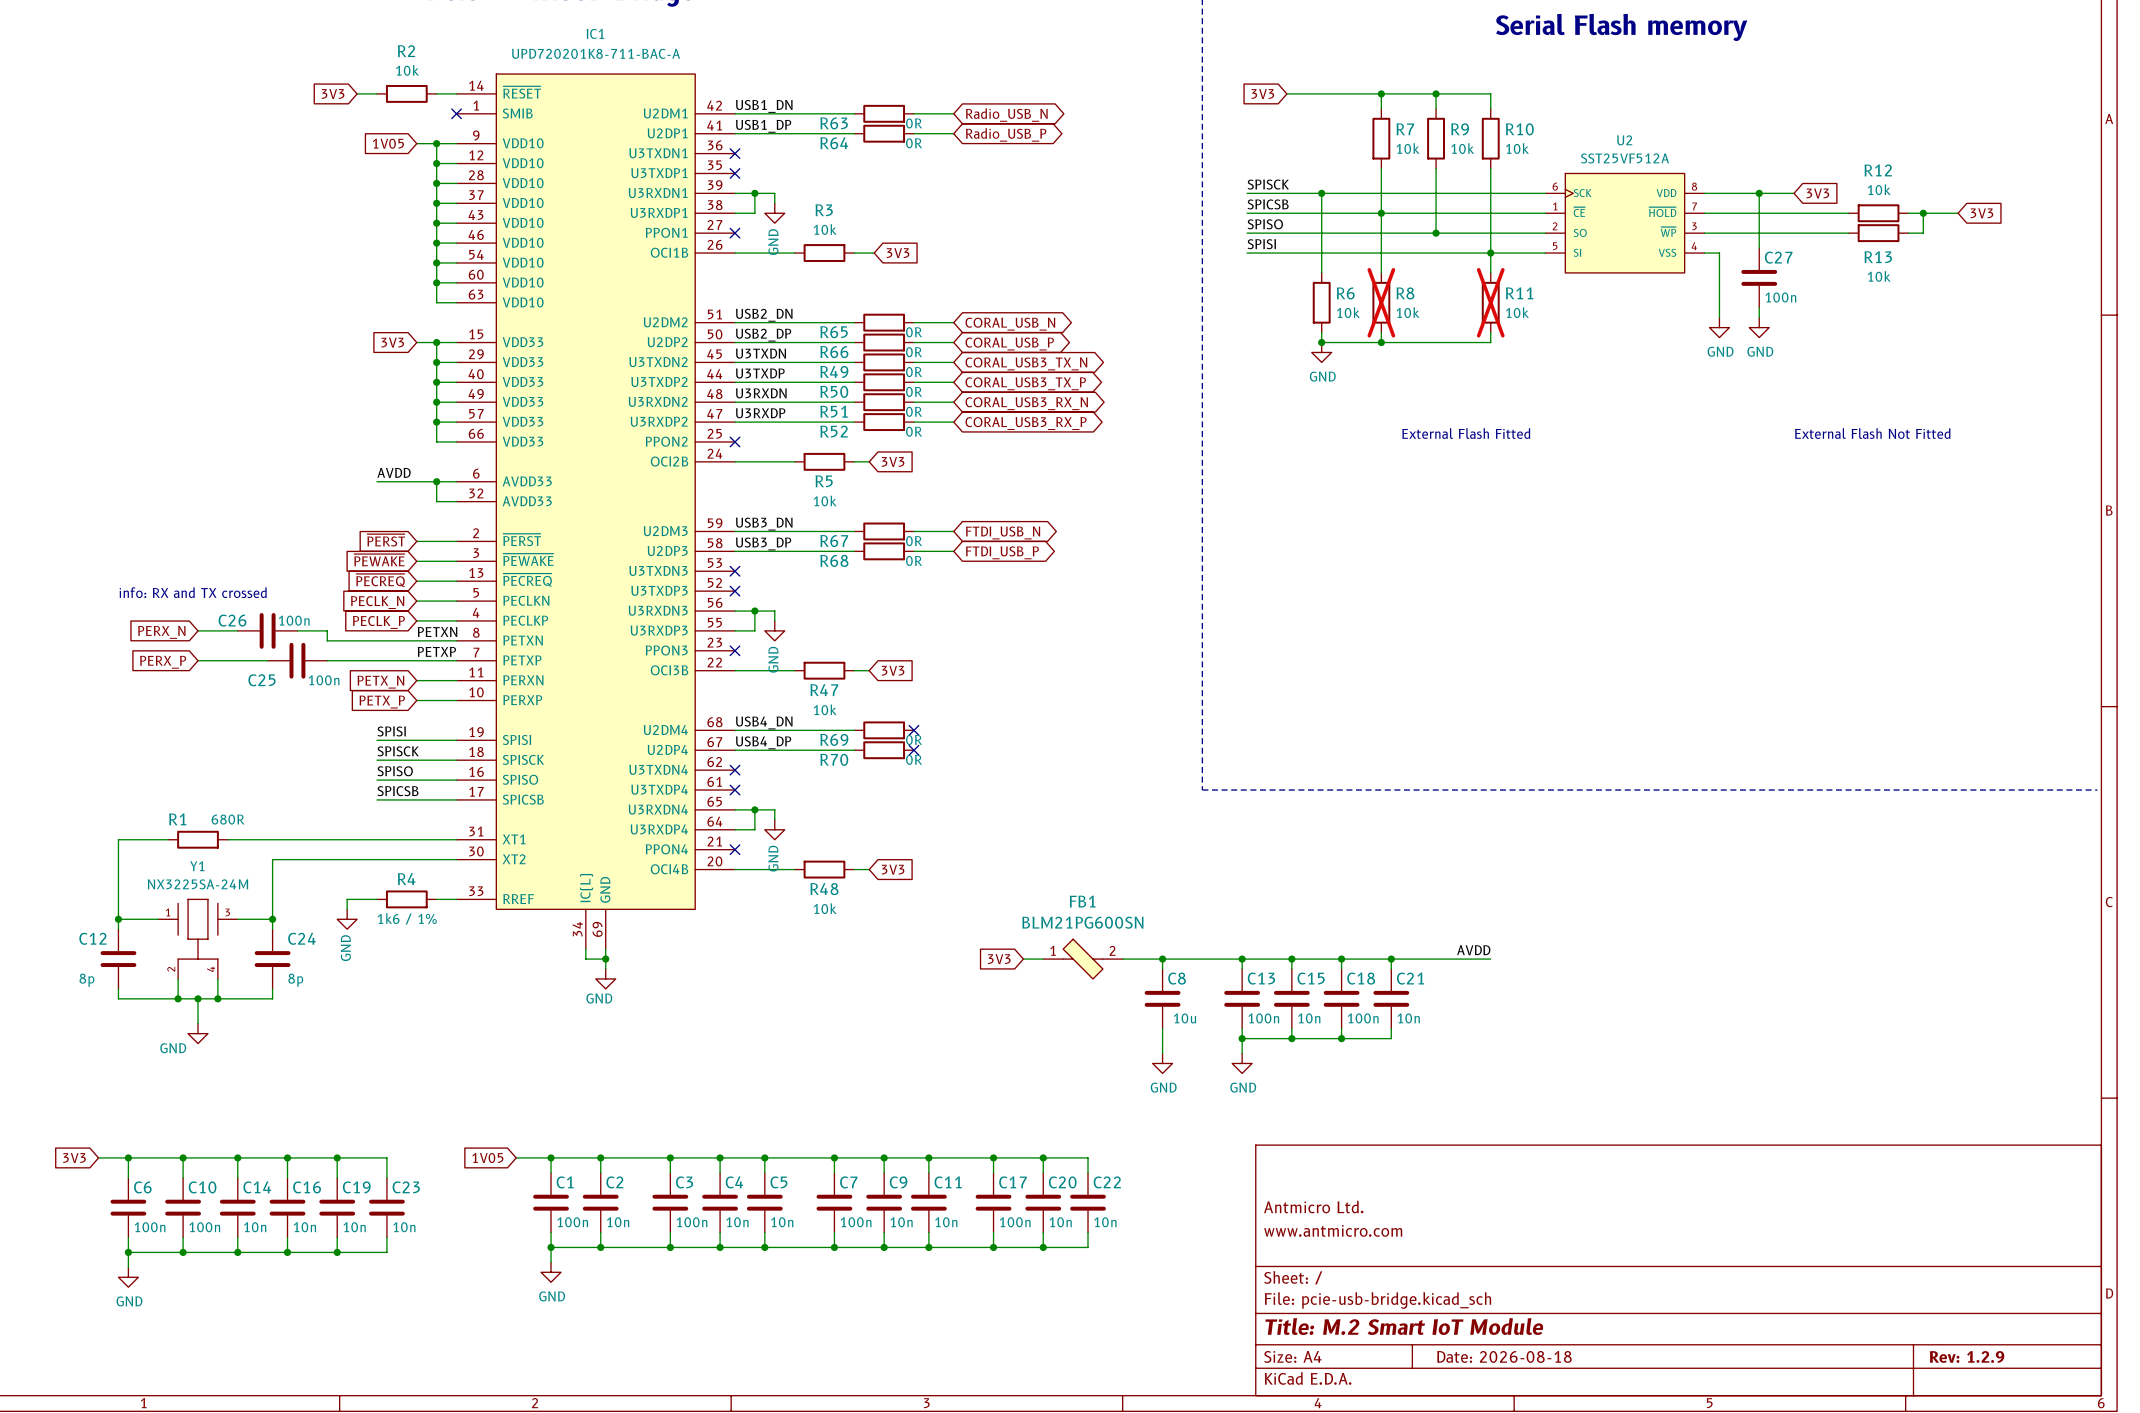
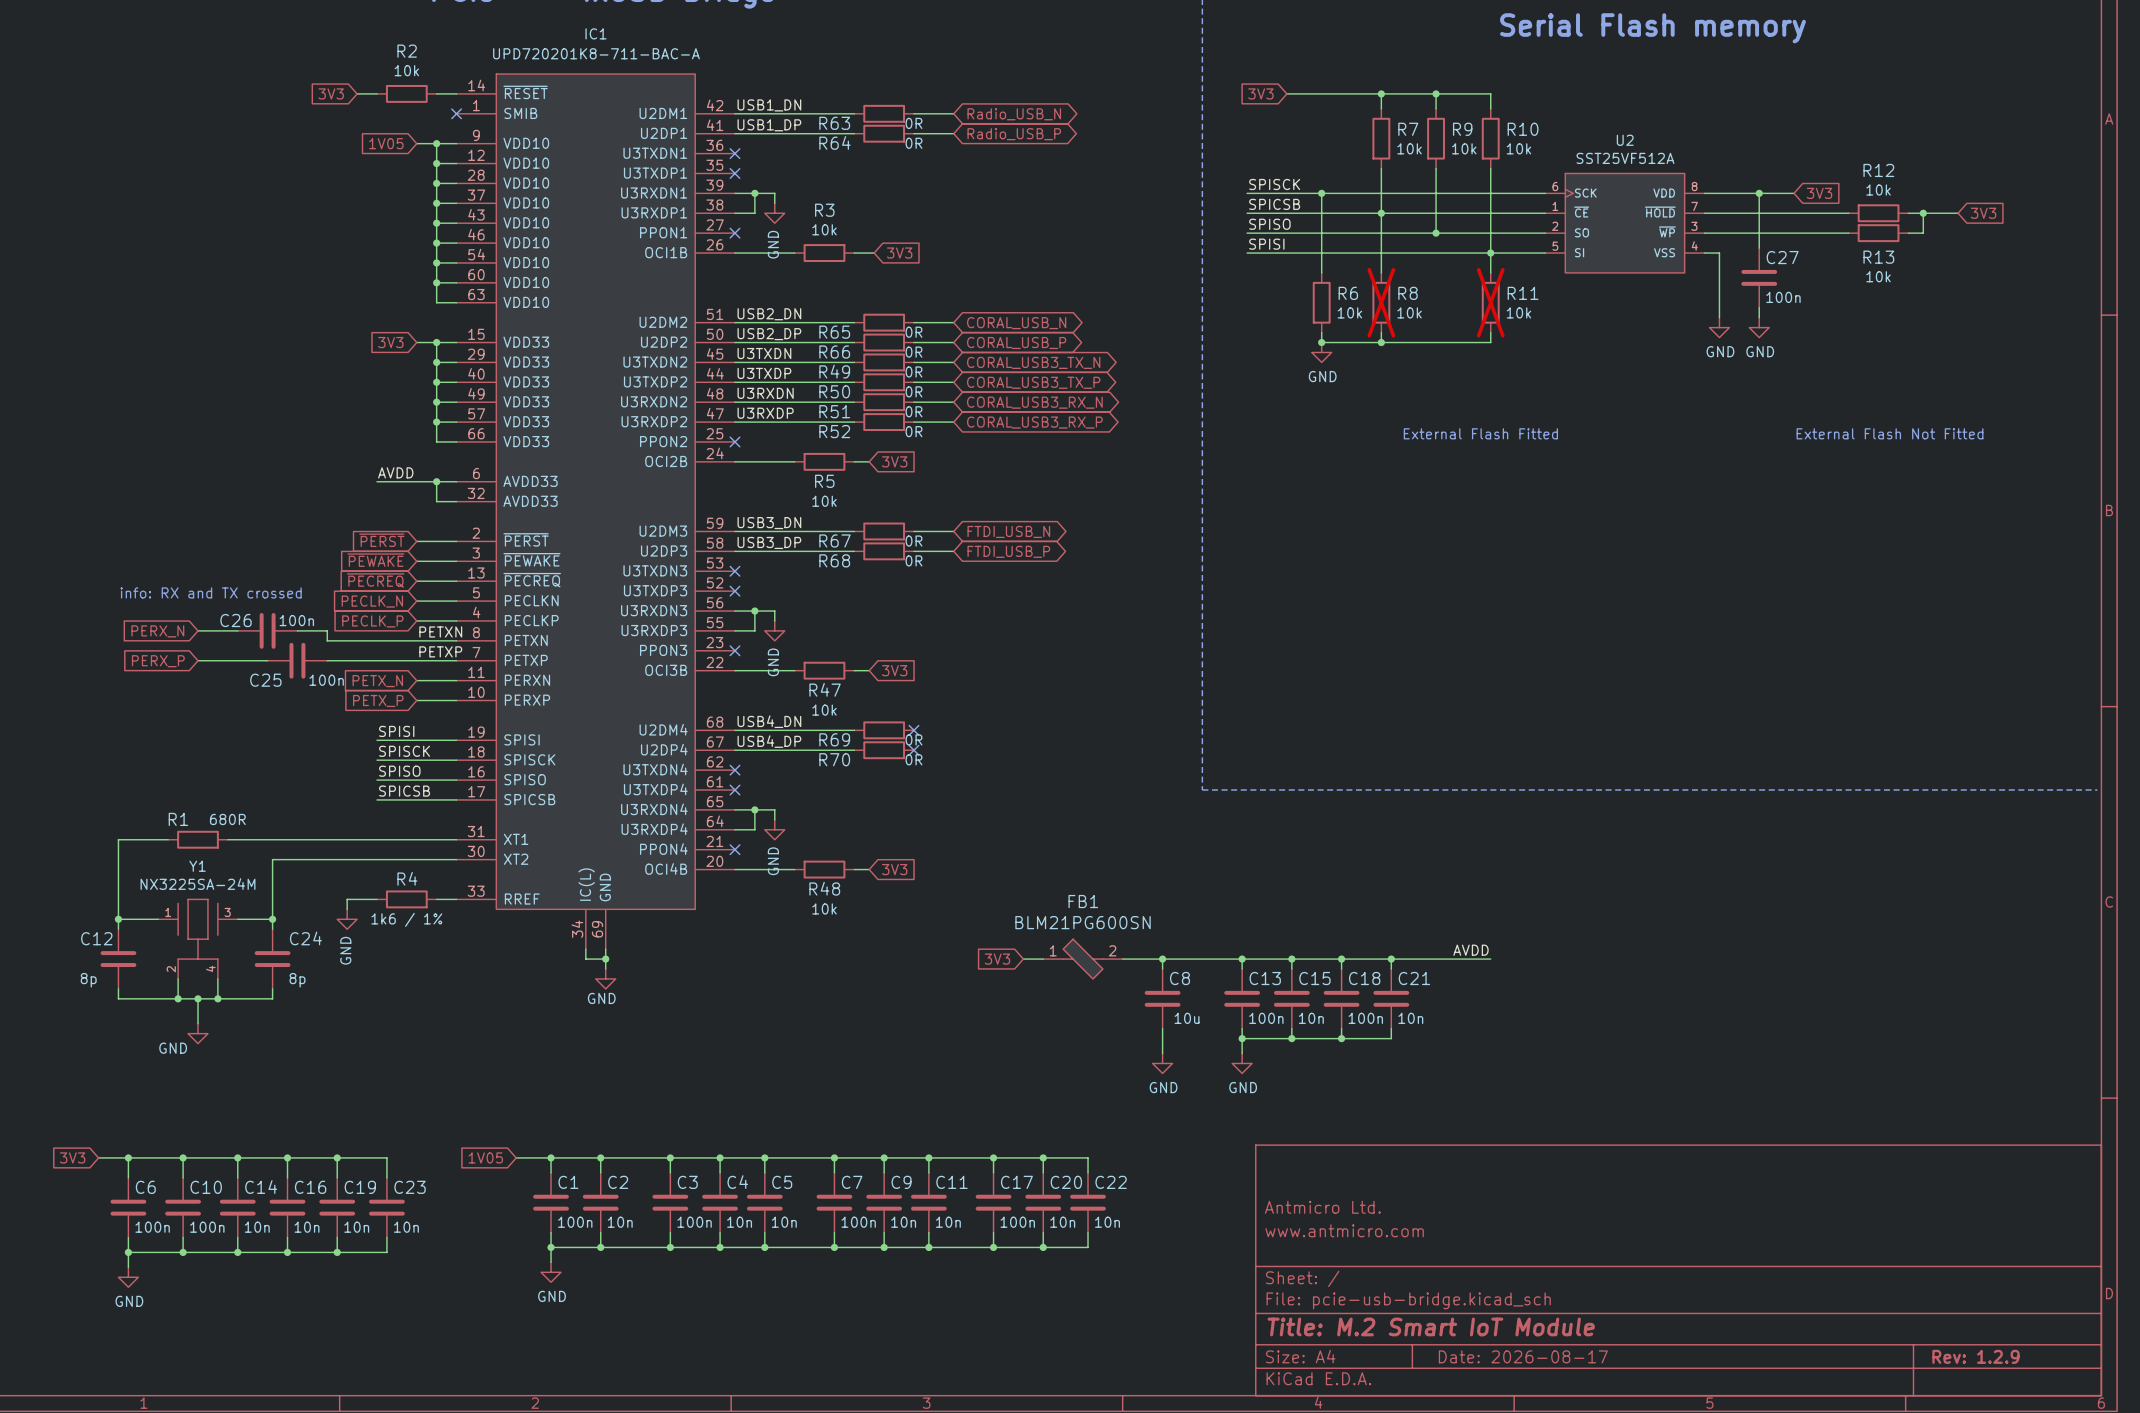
title block: Date: 2026-08-18 (1504, 1356) -> Date: 2026-08-17 (1523, 1356)

